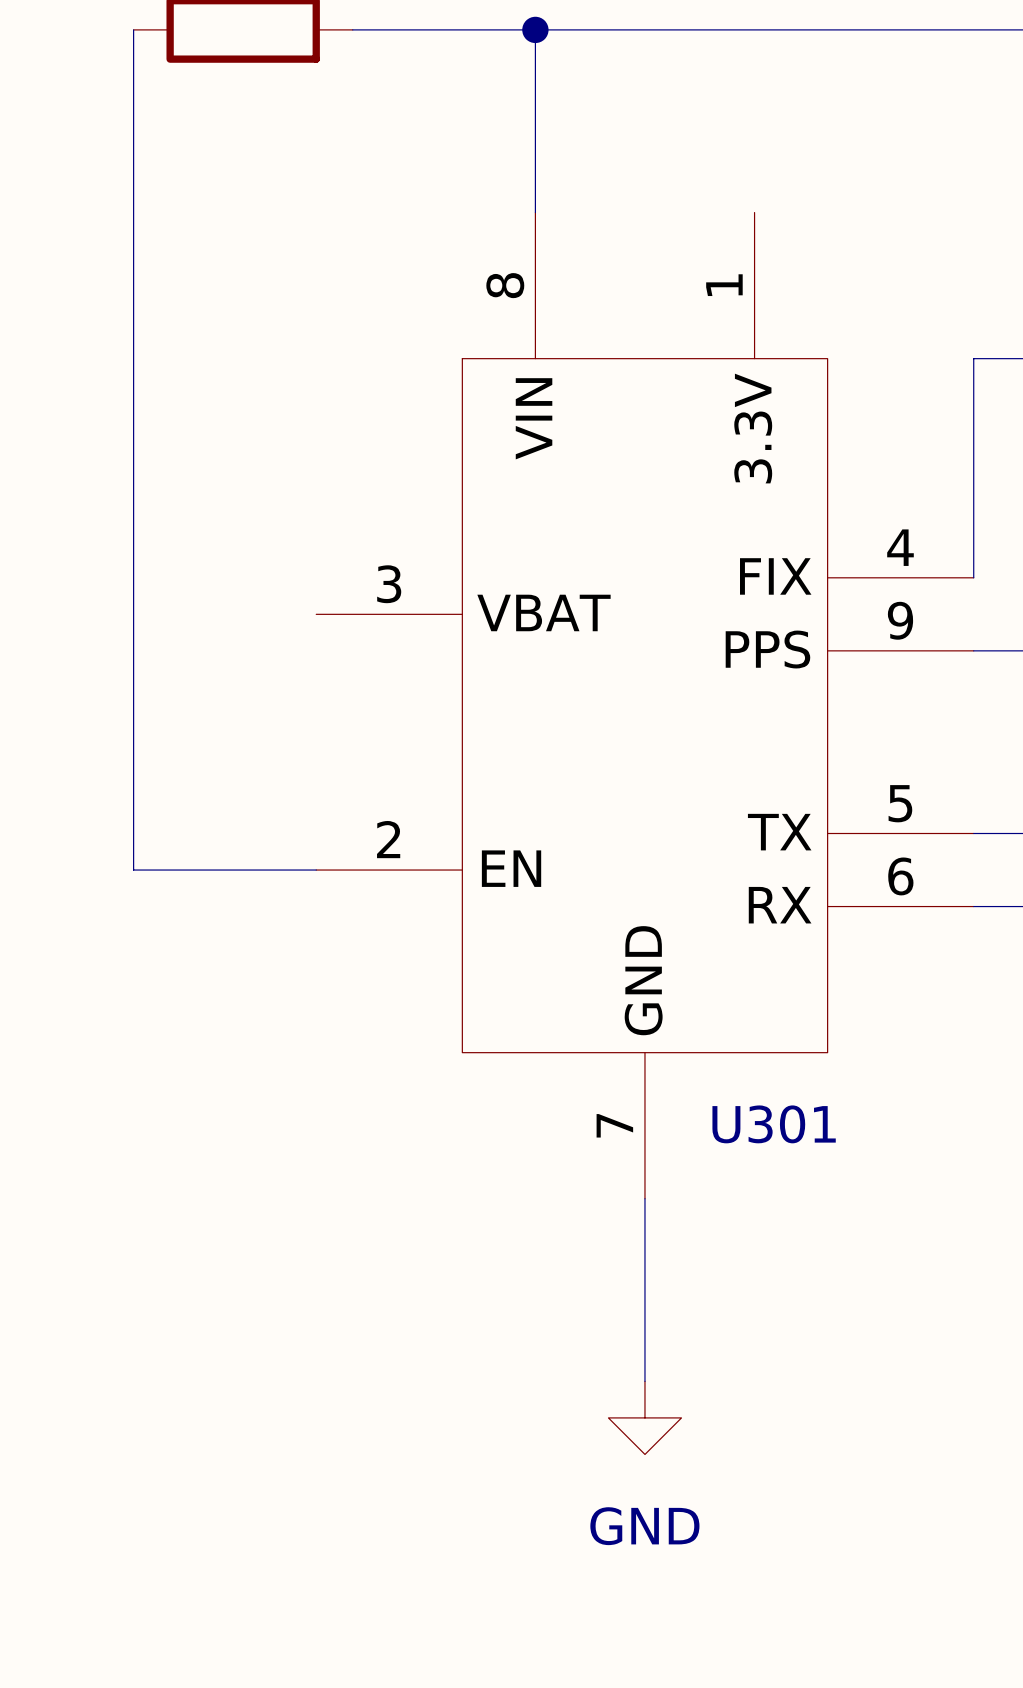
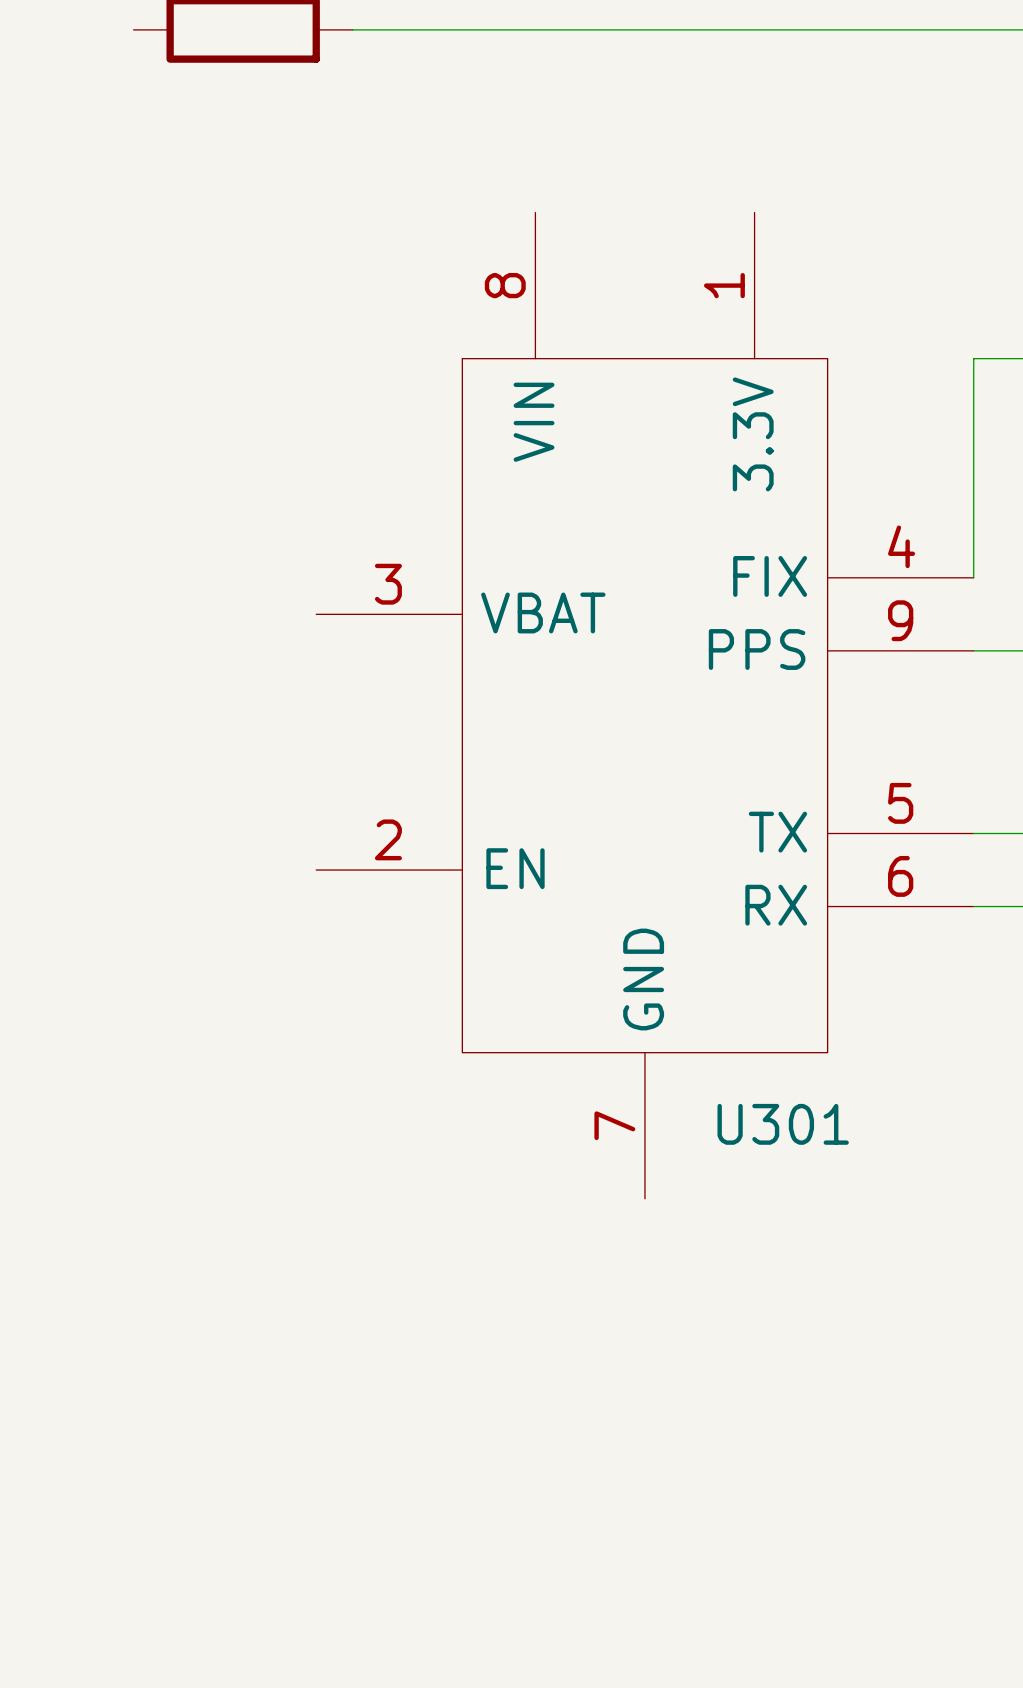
wire: (133, 29) (133, 870) (316, 870) -> none
wire: (535, 29) (535, 212) -> none
junction: (535, 29) -> none
wire: (644, 1198) (644, 1381) -> none
power symbol: GND (644, 1417) -> none

